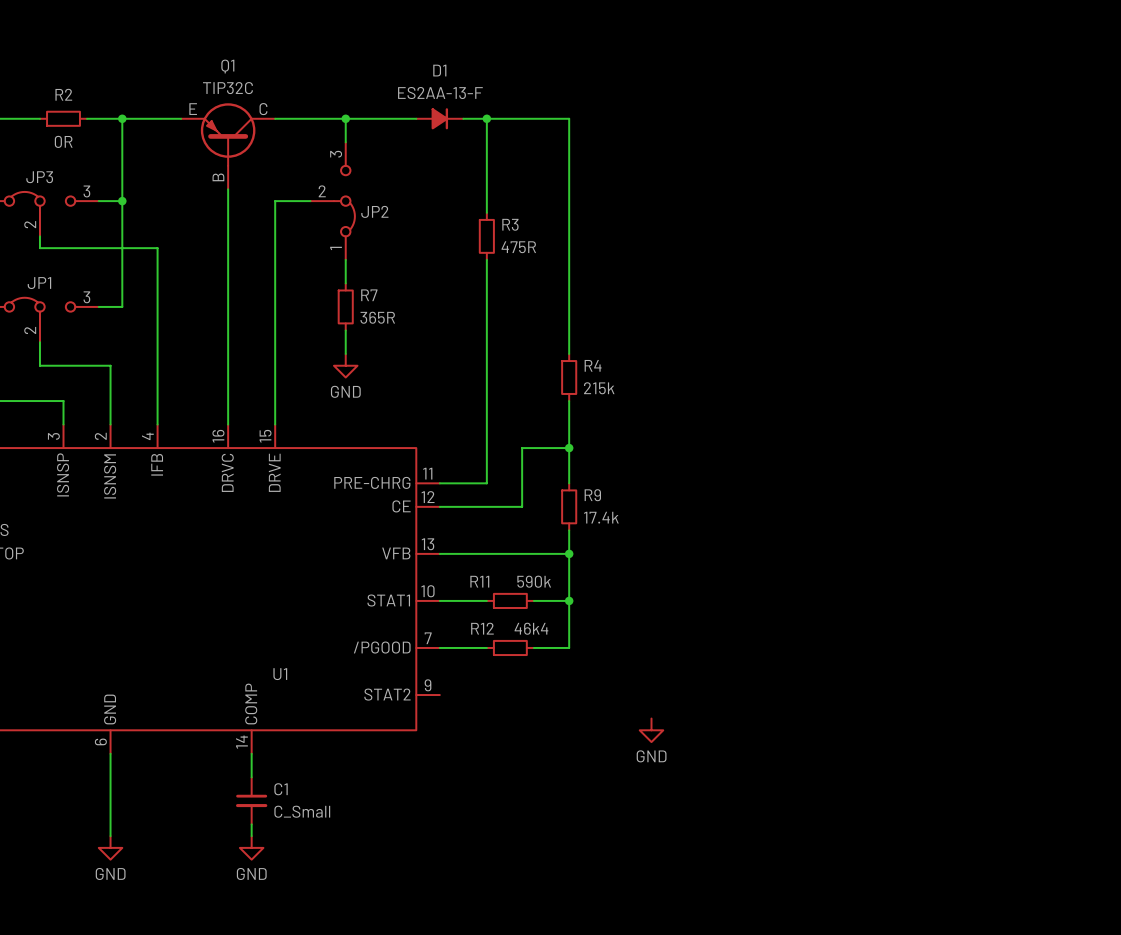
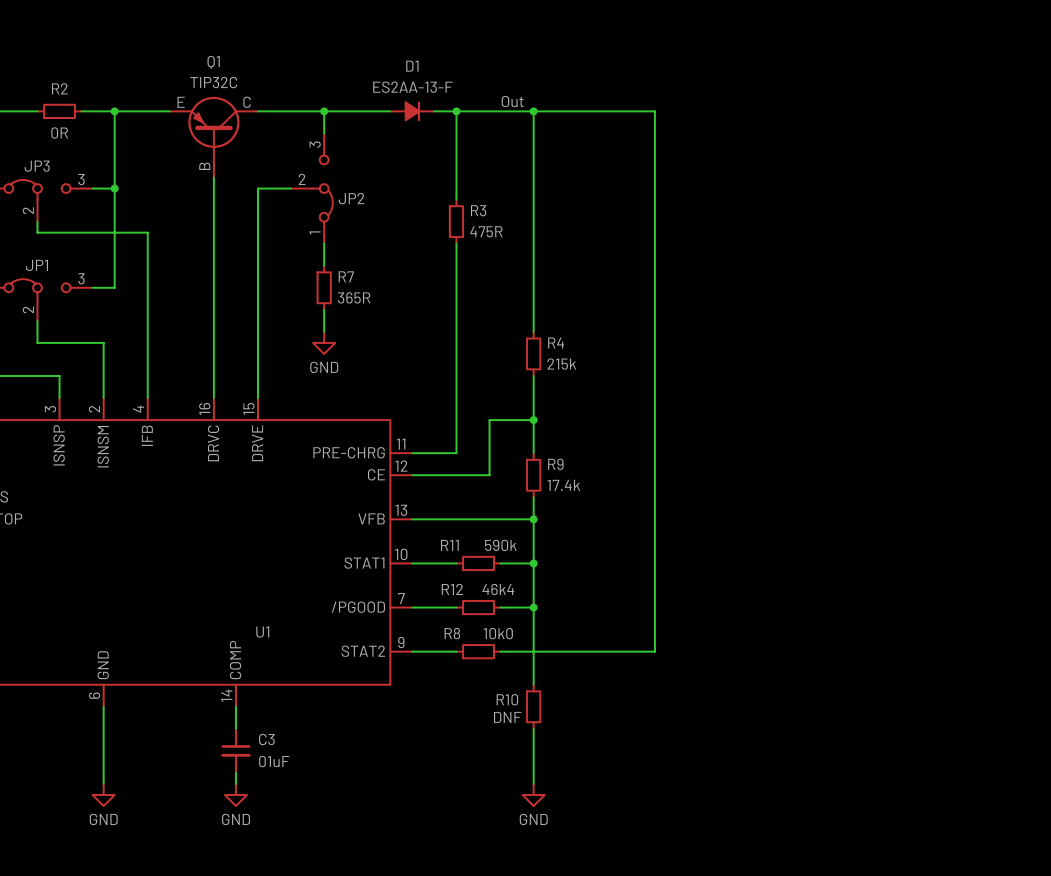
label: none -> Out (512, 101)
wire: none -> (533, 111) (654, 111) (654, 651) (500, 651)
junction: none -> (533, 111)
wire: none -> (533, 607) (533, 684)
junction: none -> (533, 607)
wire: none -> (412, 651) (456, 651)
R8: none -> 10k0 (478, 651)
power symbol position: GND (651, 730) -> GND (533, 794)
R10: none -> DNF (533, 706)
wire: none -> (533, 728) (533, 783)
C1 name: C1 (281, 789) -> C3 (266, 739)
C1 value: C_Small (302, 811) -> 01uF (274, 761)

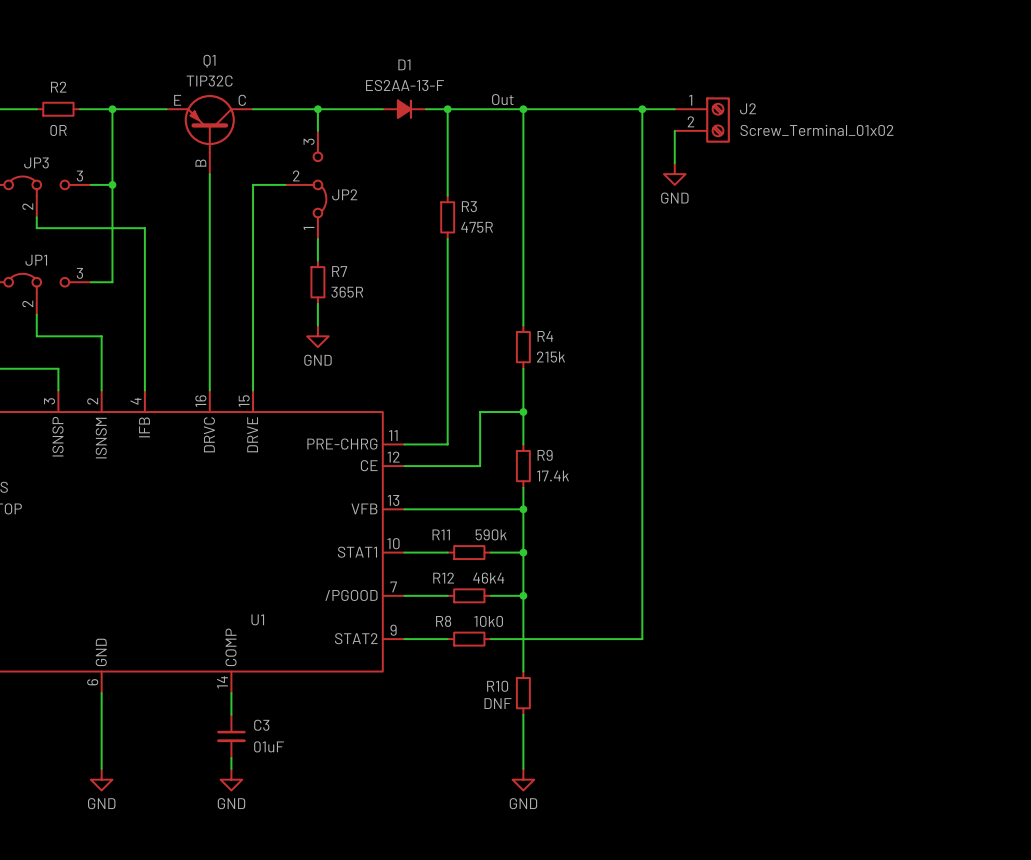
wire: none -> (642, 109) (674, 109)
junction: none -> (642, 109)
J2: none -> Screw_Terminal_01x02 (702, 120)
wire: none -> (674, 130) (674, 163)
power symbol: none -> GND (674, 174)

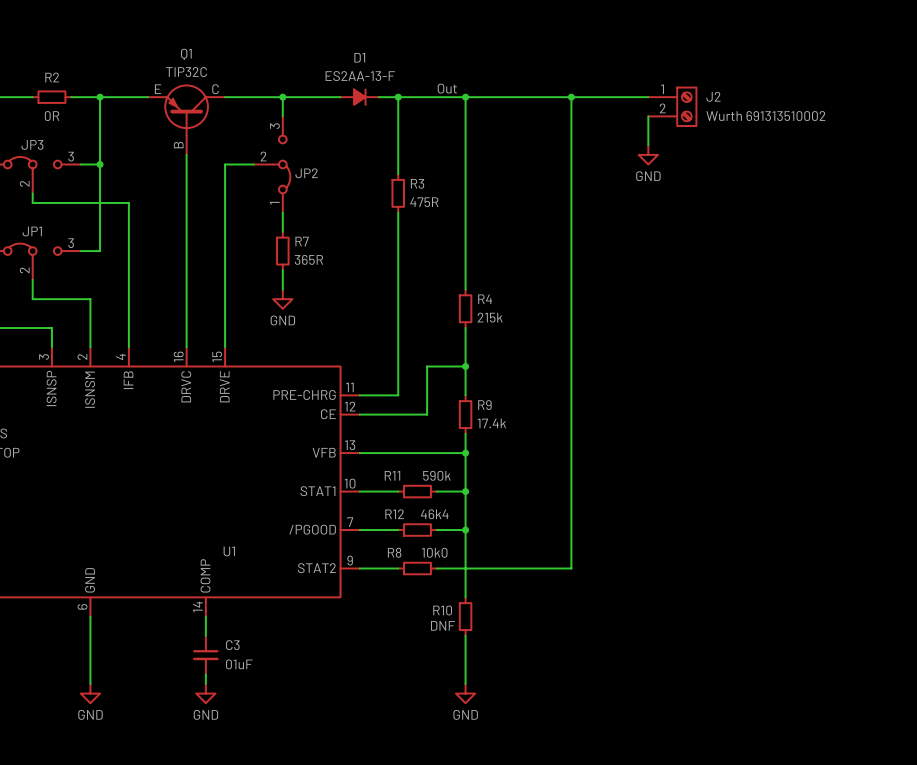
J2 position: (702, 120) -> (672, 106)
wire: (674, 130) (674, 163) -> (648, 116) (648, 145)
J2 value: Screw_Terminal_01x02 (816, 130) -> Wurth 691313510002 (765, 116)
power symbol position: GND (674, 174) -> GND (648, 154)

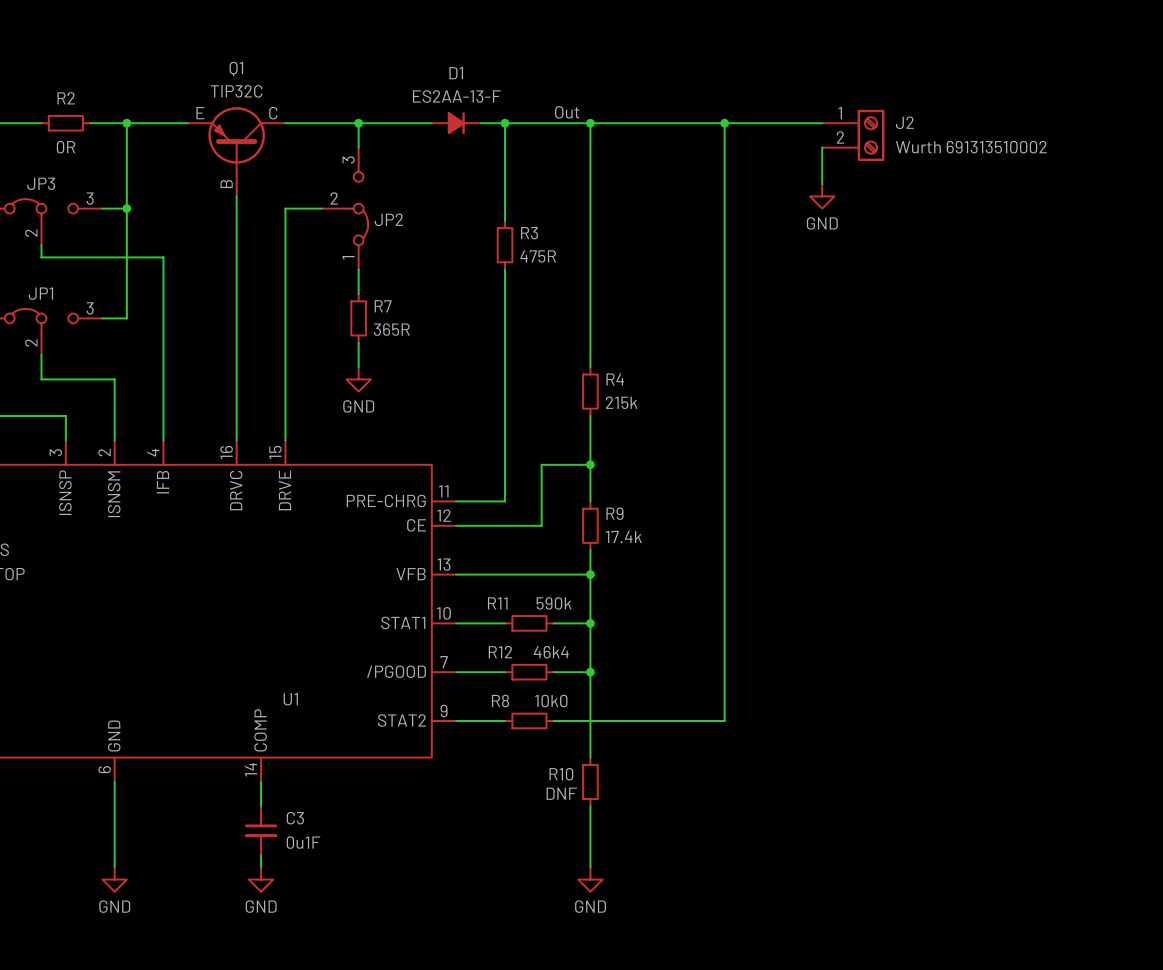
C3 value: 01uF (239, 664) -> 0u1F (303, 842)

